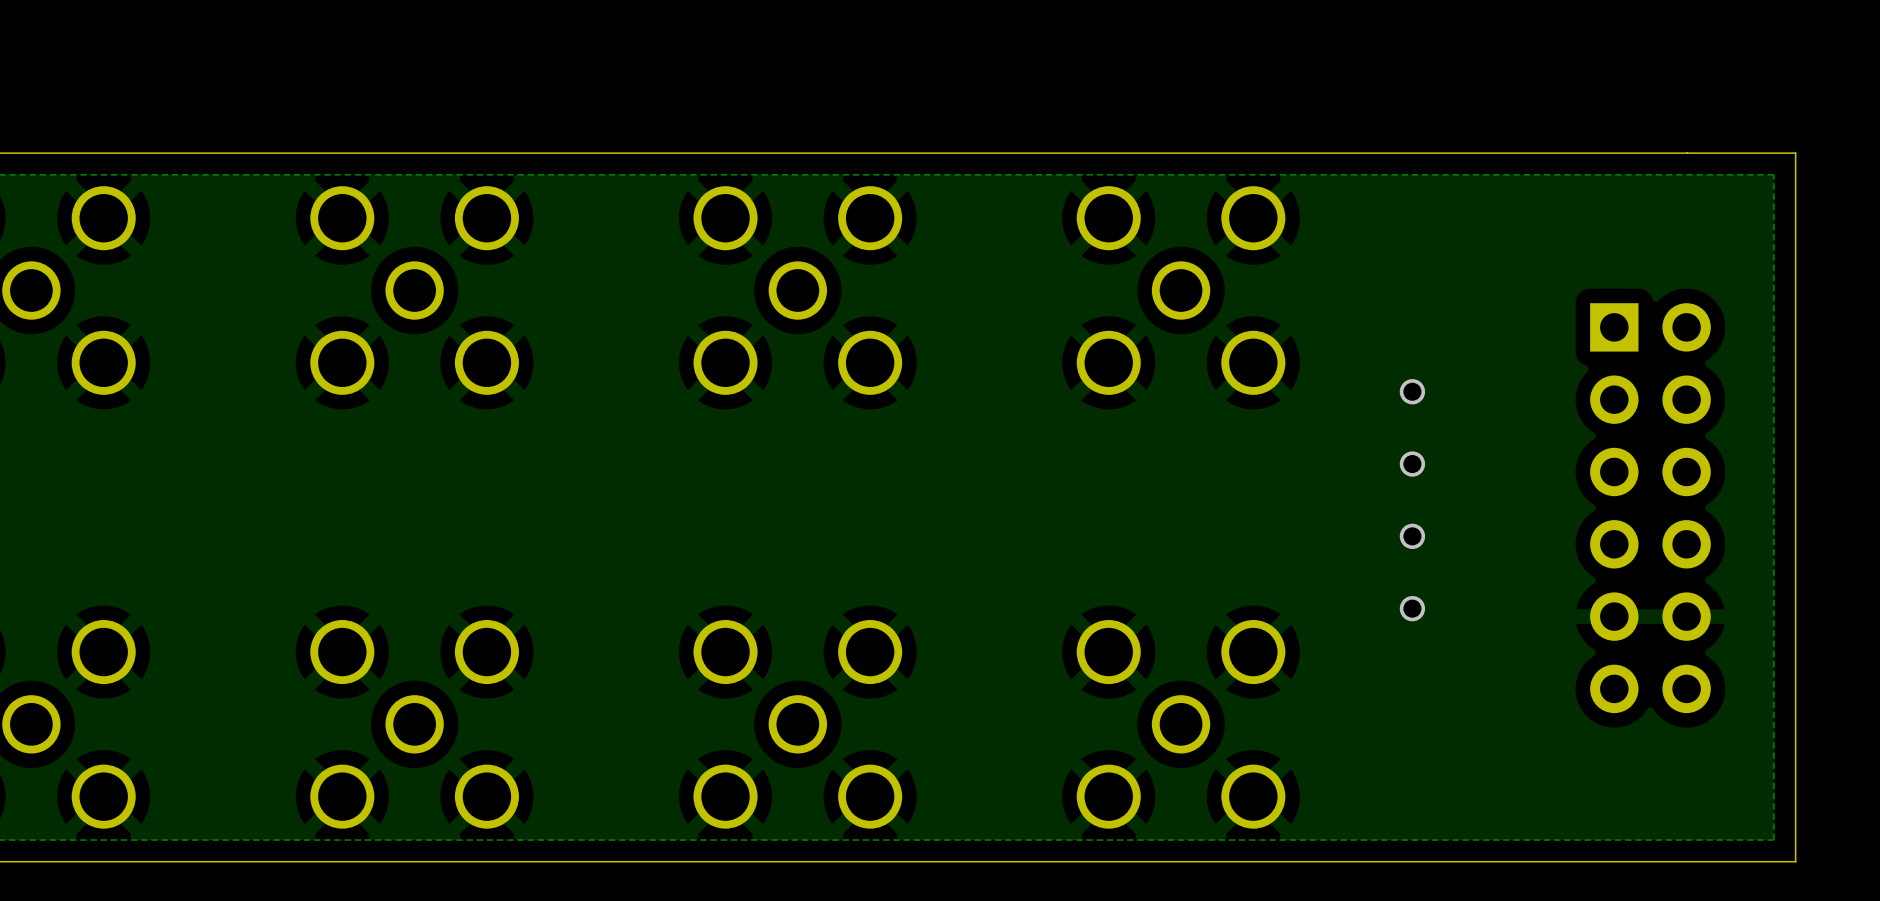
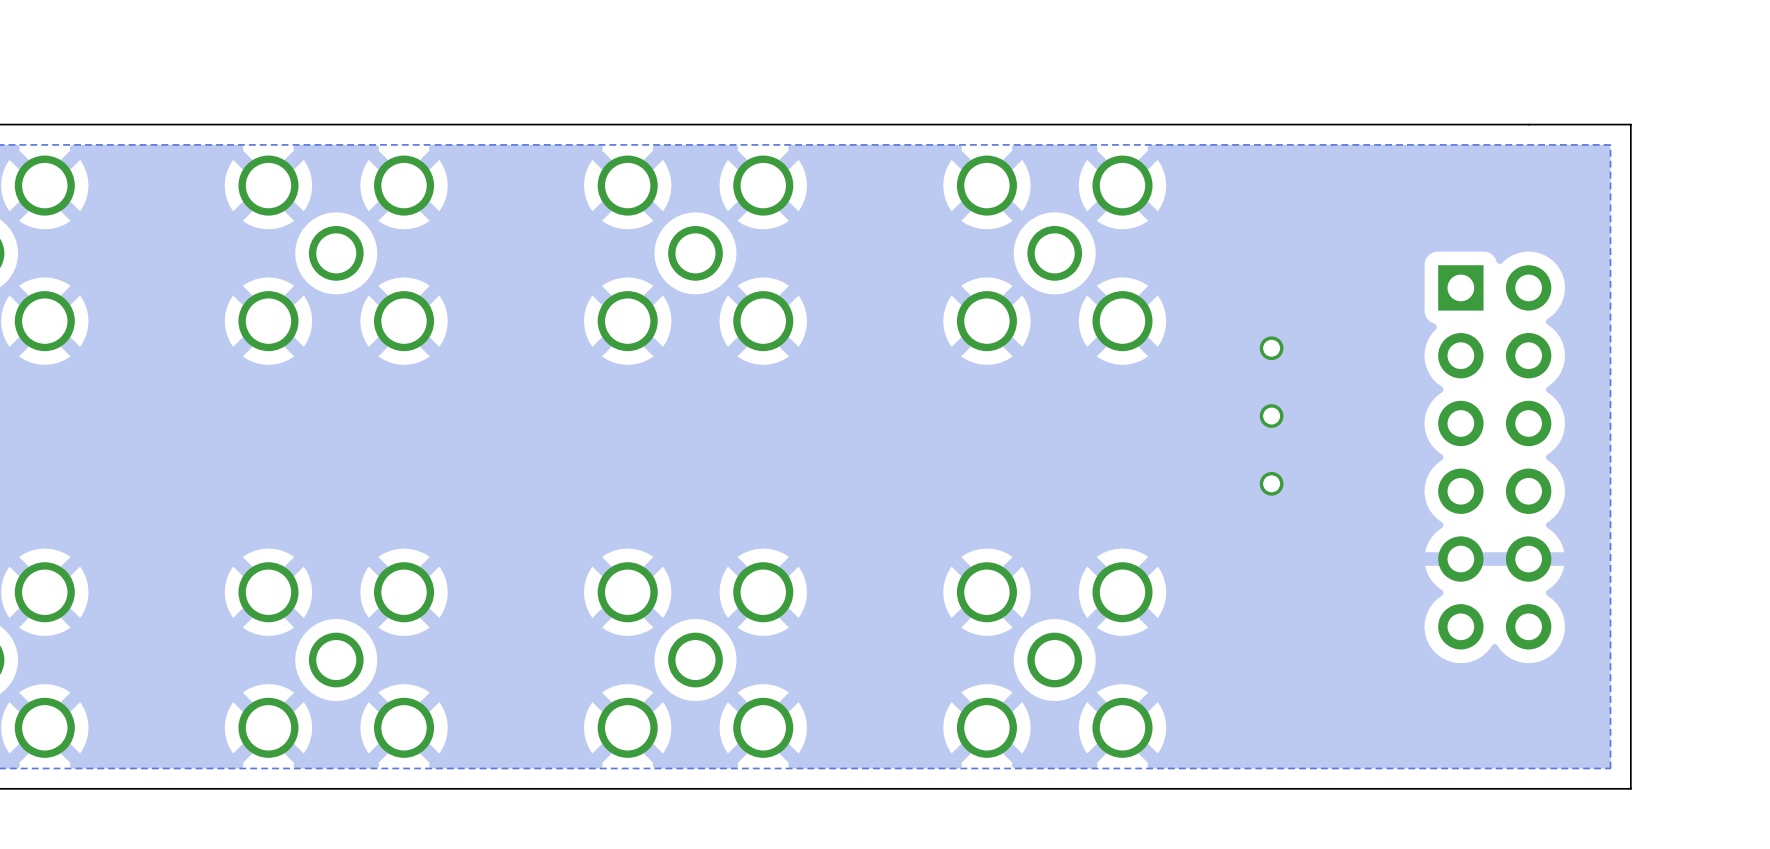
via: (1412, 608) -> none

